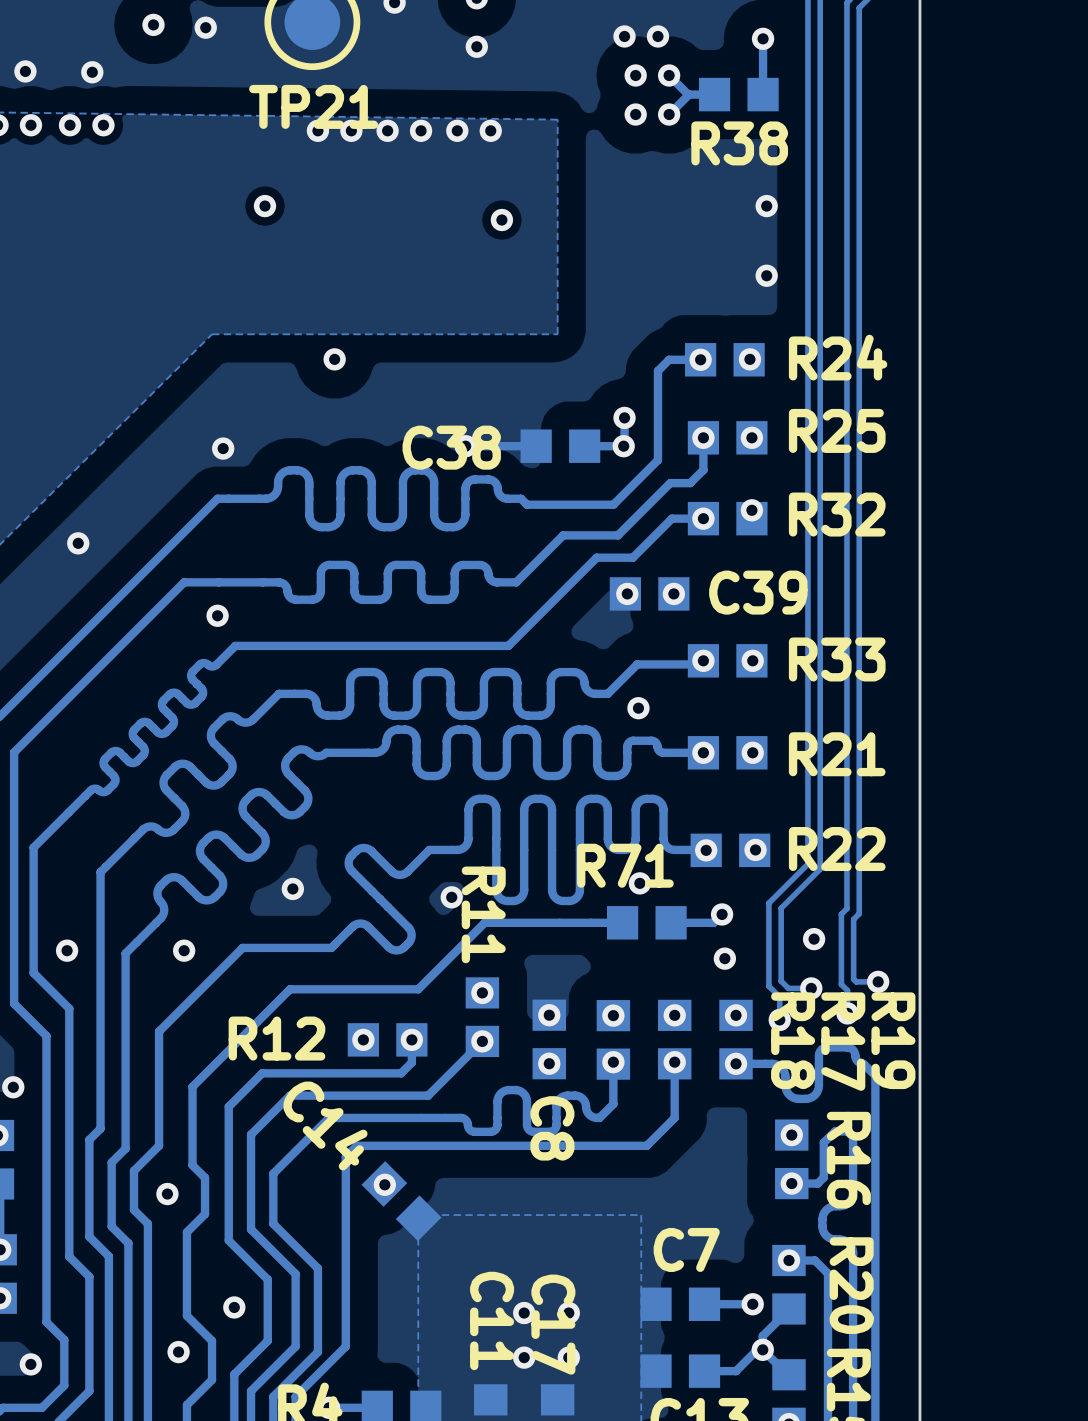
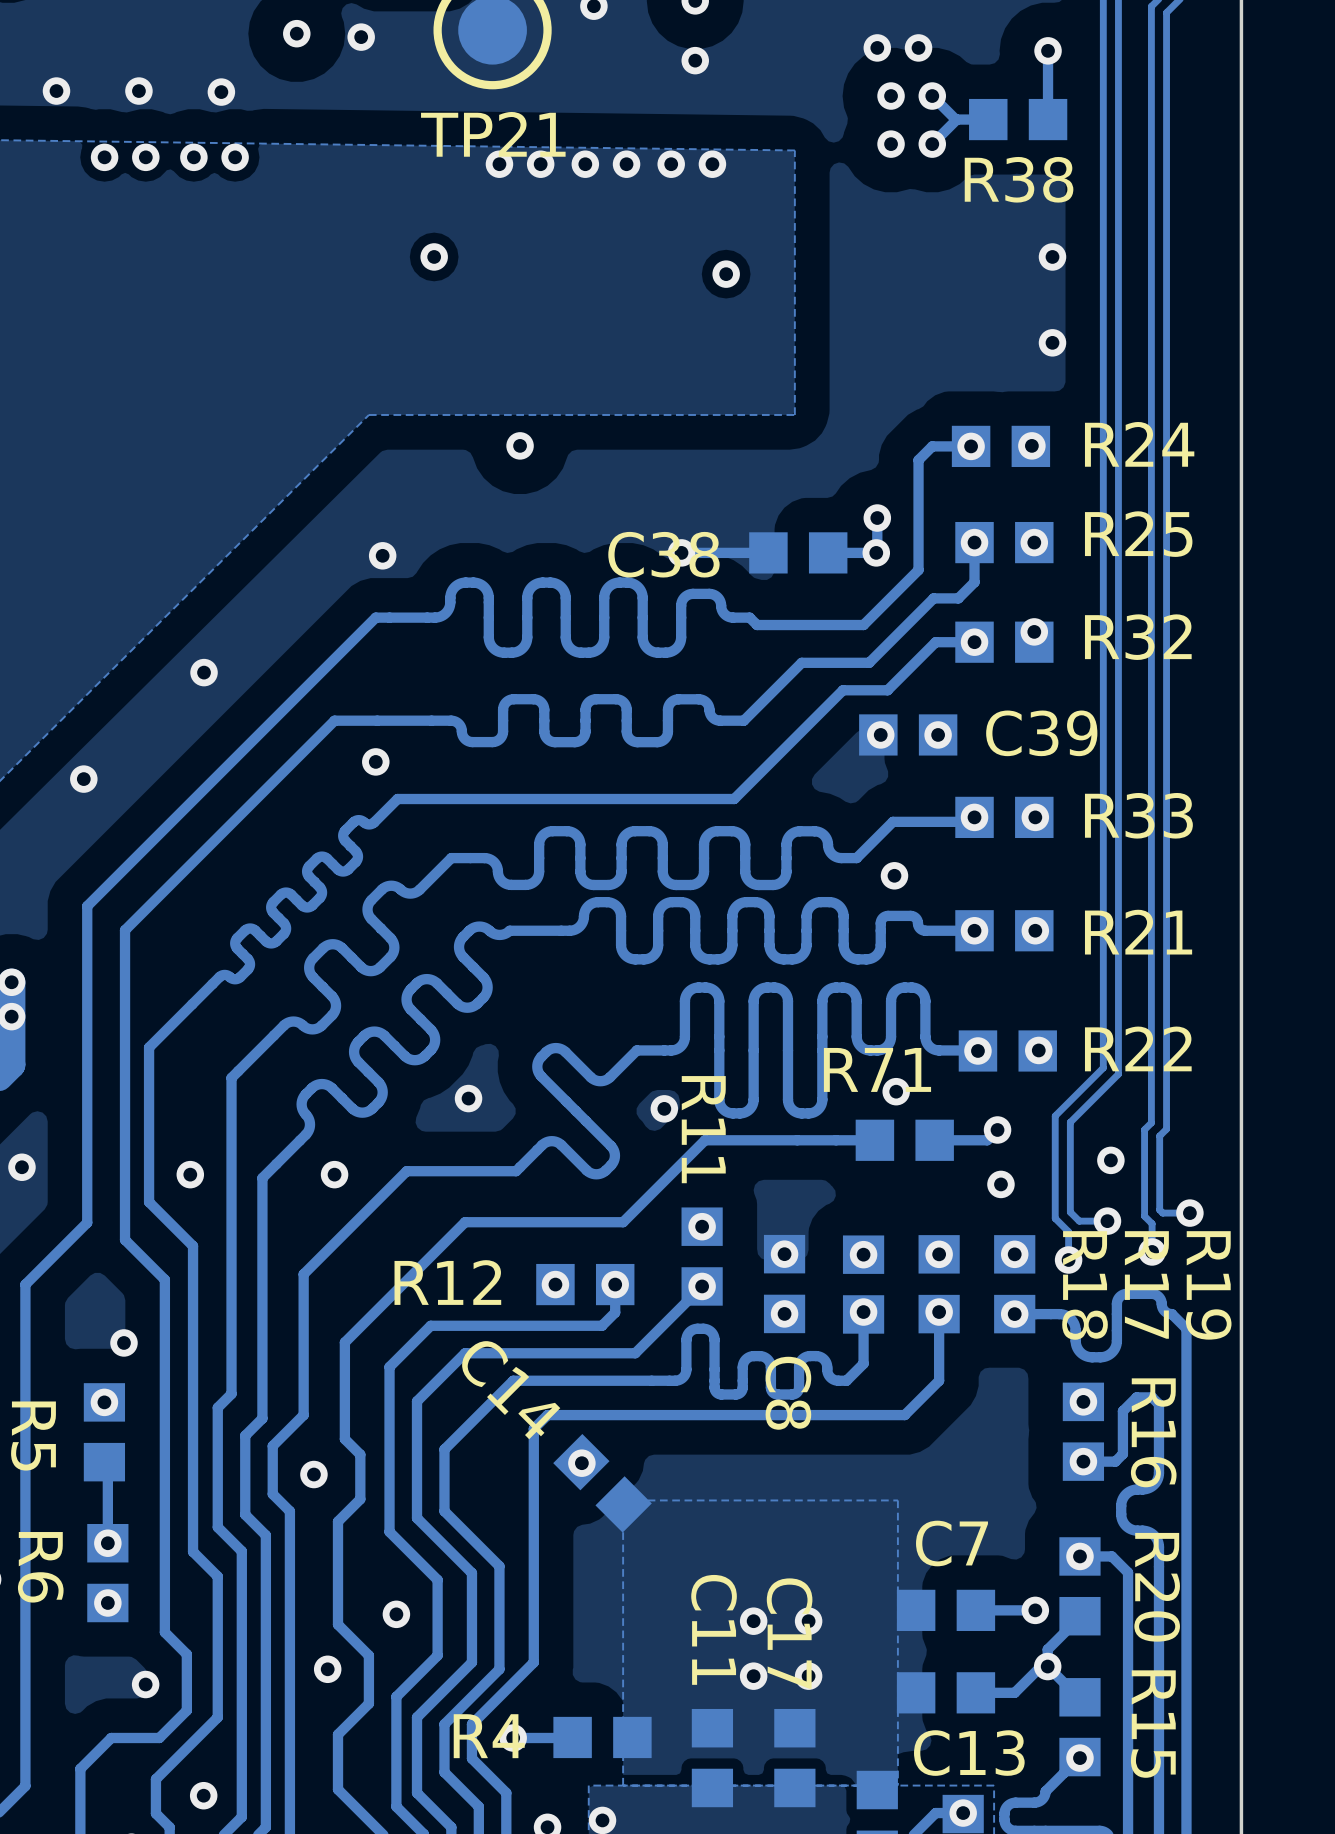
track: (597, 1117) (588, 1113) (581, 1097) (576, 1095) (564, 1096) (556, 1103) (556, 1125) (554, 1129) (549, 1131) (531, 1131) (527, 1125) (526, 1097) (522, 1092) (515, 1090) (505, 1090) (498, 1096) (497, 1125) (493, 1130) (472, 1131) (468, 1128) (466, 1120) (460, 1117) -> (843, 1380) (835, 1380) (830, 1377) (826, 1362) (821, 1357) (807, 1356) (799, 1363) (797, 1391) (792, 1394) (776, 1394) (771, 1389) (769, 1361) (763, 1356) (752, 1356) (746, 1358) (743, 1363) (741, 1391) (736, 1394) (719, 1394) (714, 1388) (714, 1337) (710, 1331) (703, 1328) (693, 1329) (687, 1335) (686, 1371) (682, 1378) (675, 1380)

